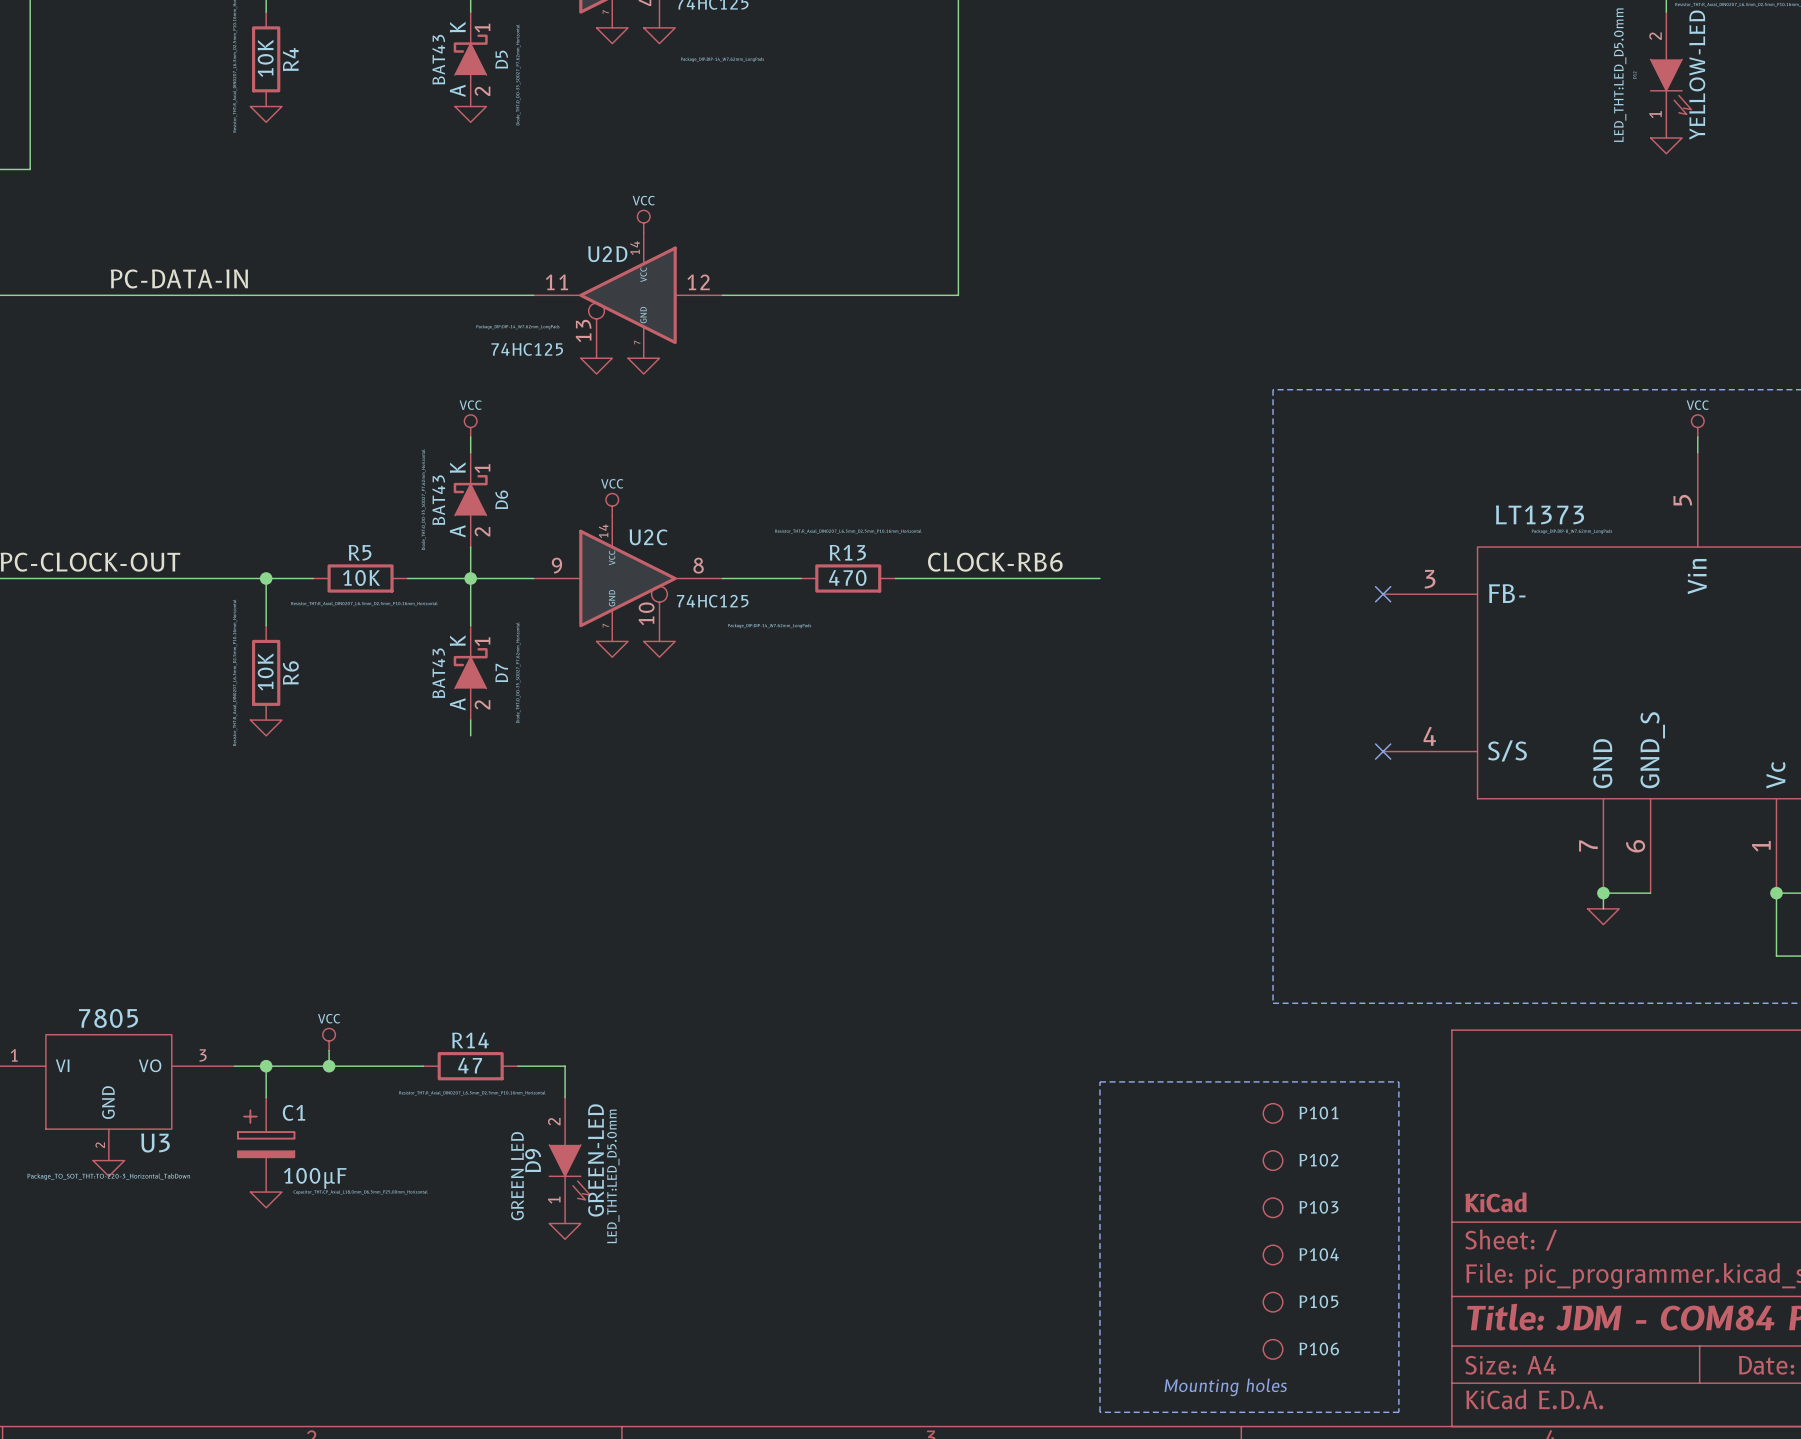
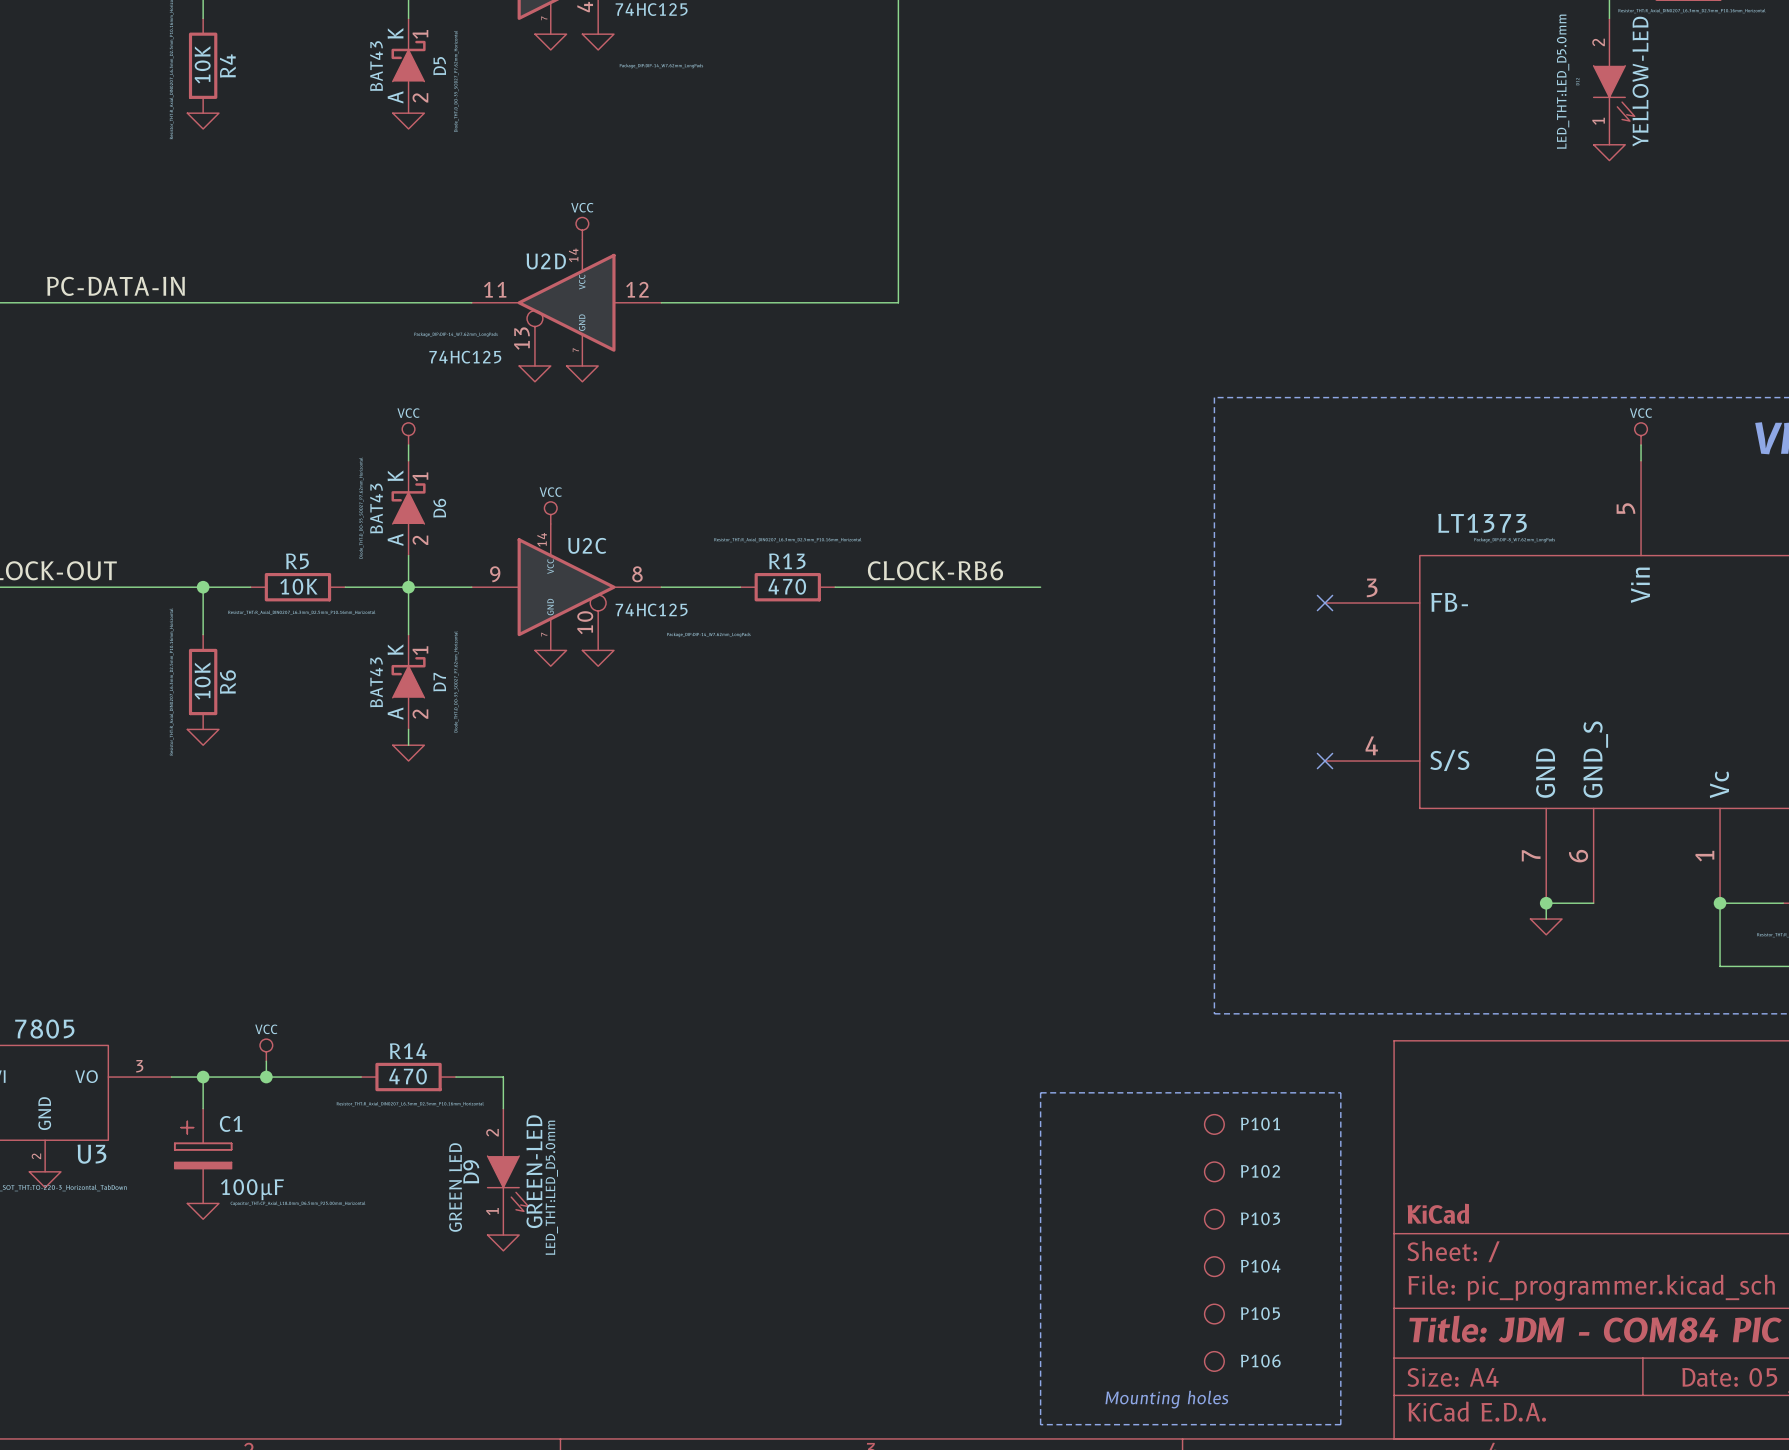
power symbol: none -> (408, 753)
R14 value: 47 (470, 1065) -> 470 (408, 1076)

